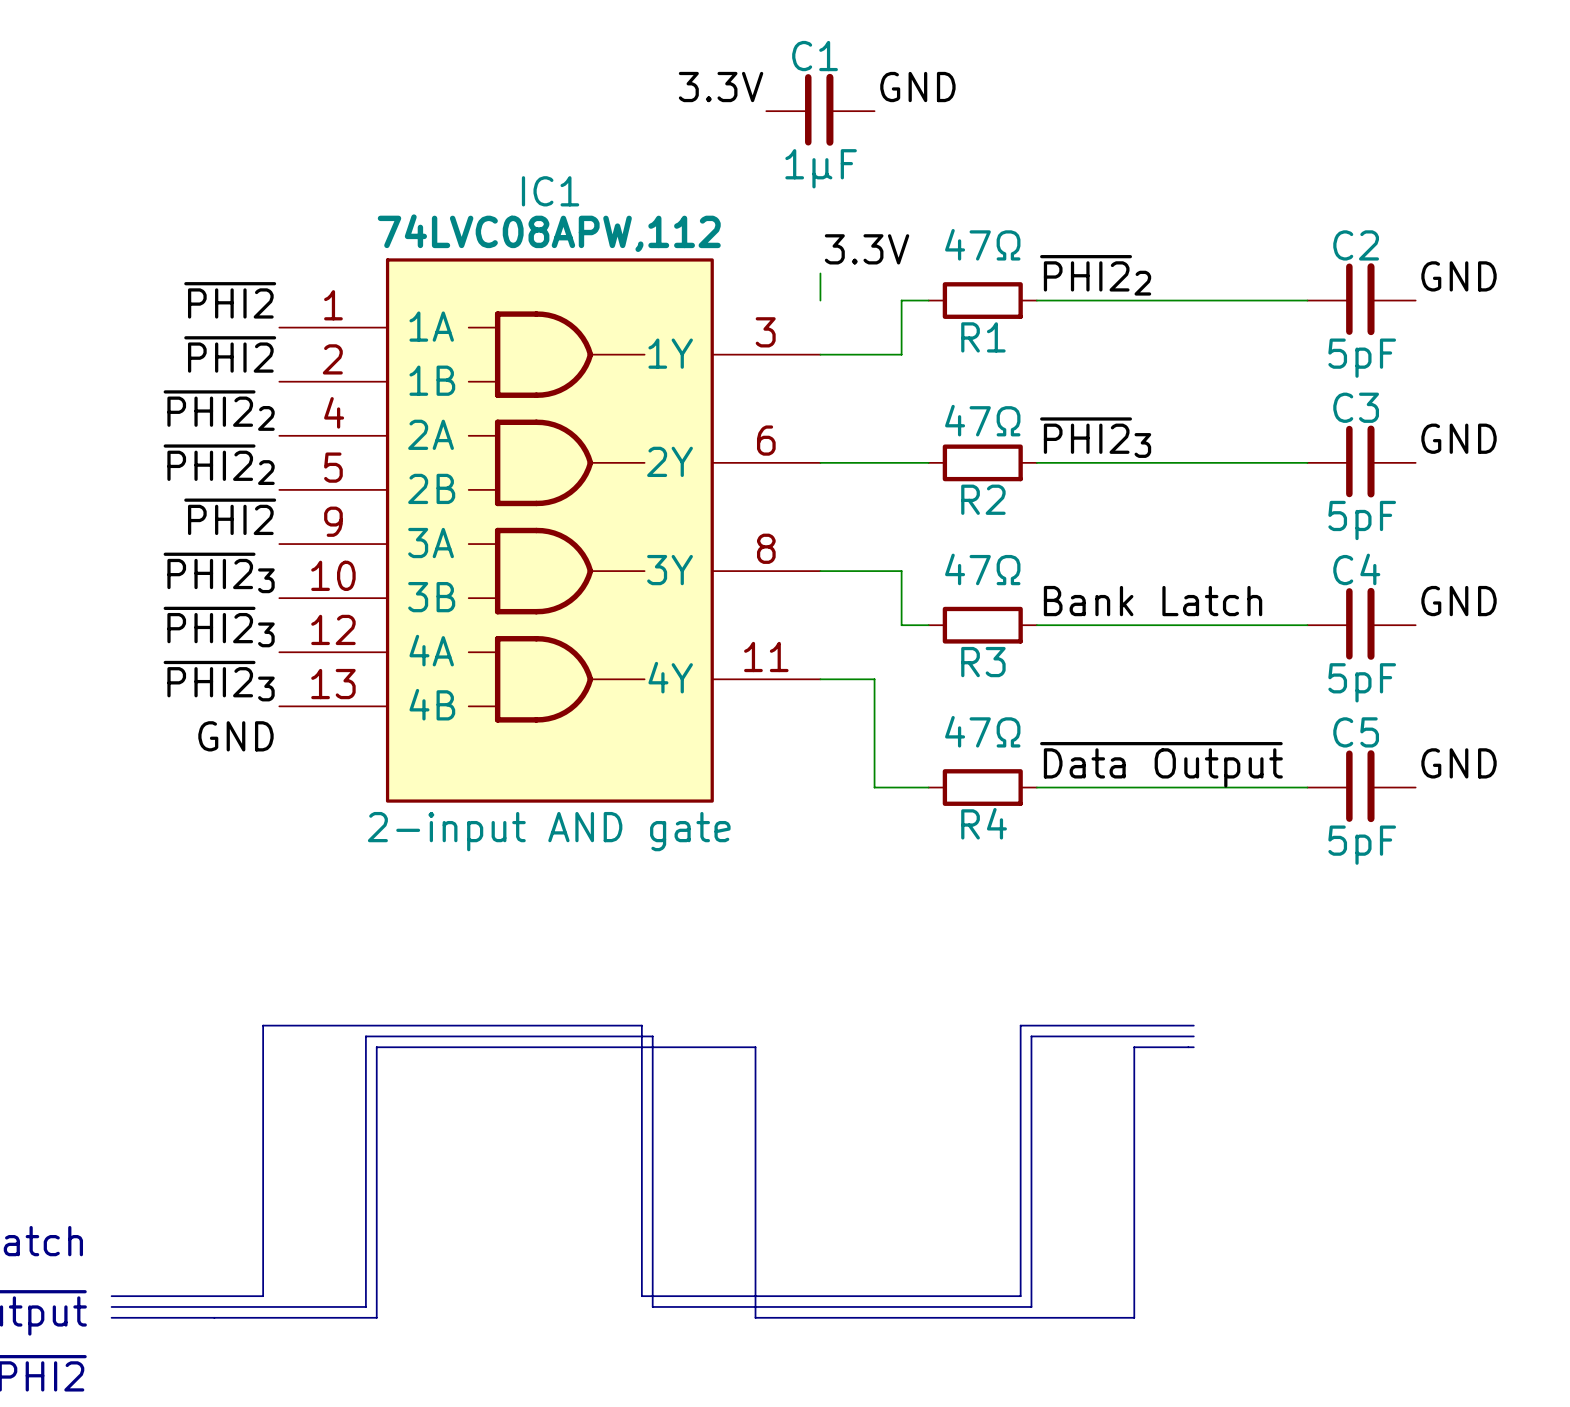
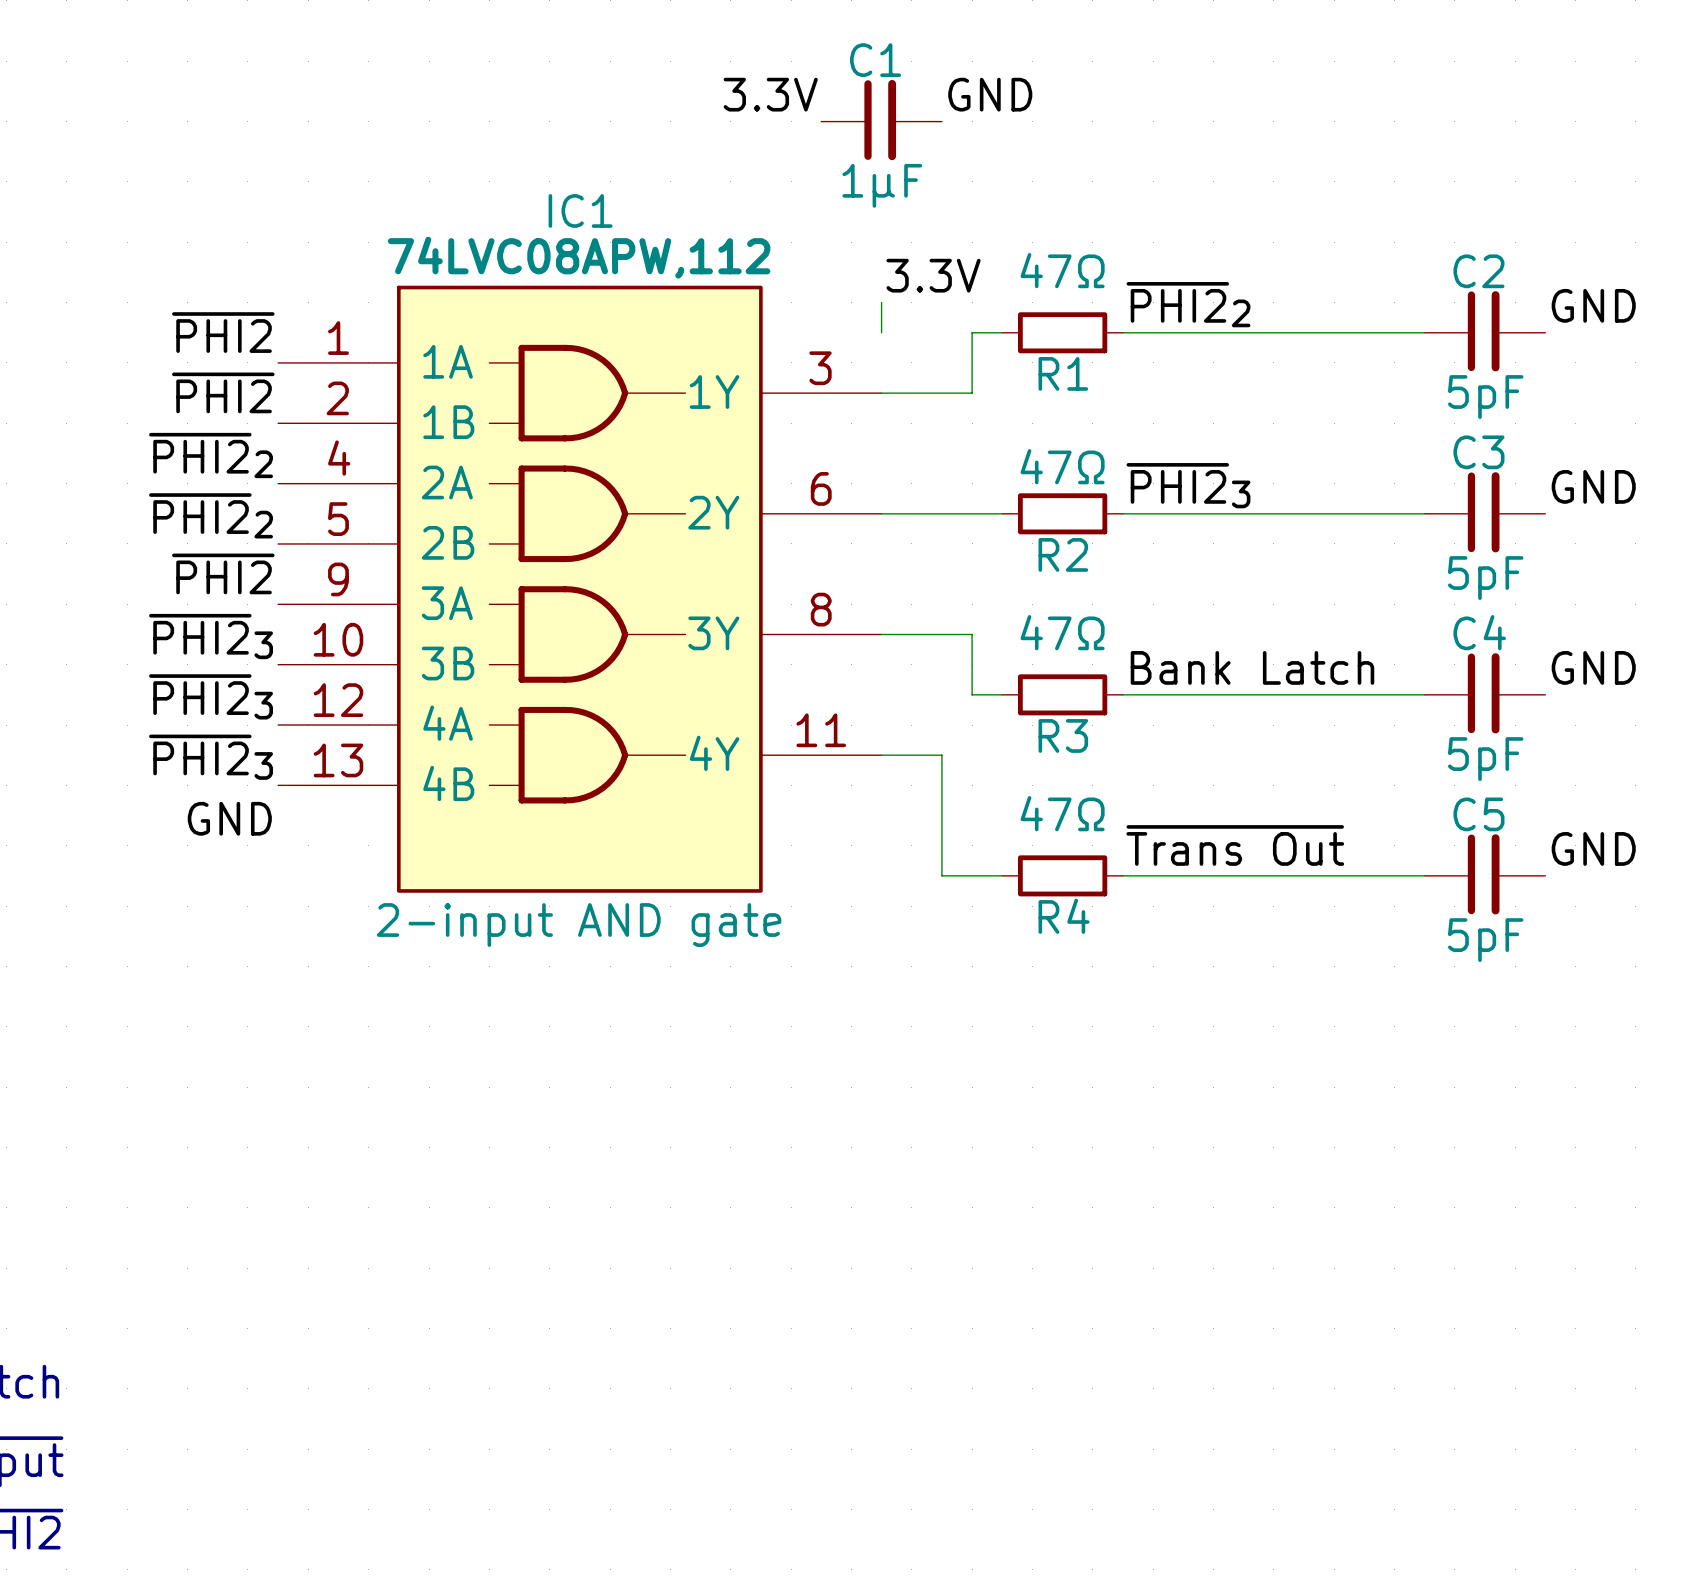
label: ~{Data Output} (1161, 764) -> ~{Trans Out} (1235, 845)
line: (1193, 1025) (1020, 1025) (1020, 1296) (641, 1296) (641, 1025) (263, 1025) (263, 1296) (111, 1296) -> none
line: (1193, 1036) (1031, 1036) (1031, 1306) (652, 1306) (652, 1036) (365, 1036) (365, 1306) (111, 1306) -> none
line: (1193, 1047) (1134, 1047) (1134, 1317) (755, 1317) (755, 1047) (376, 1047) (376, 1317) (111, 1317) -> none

